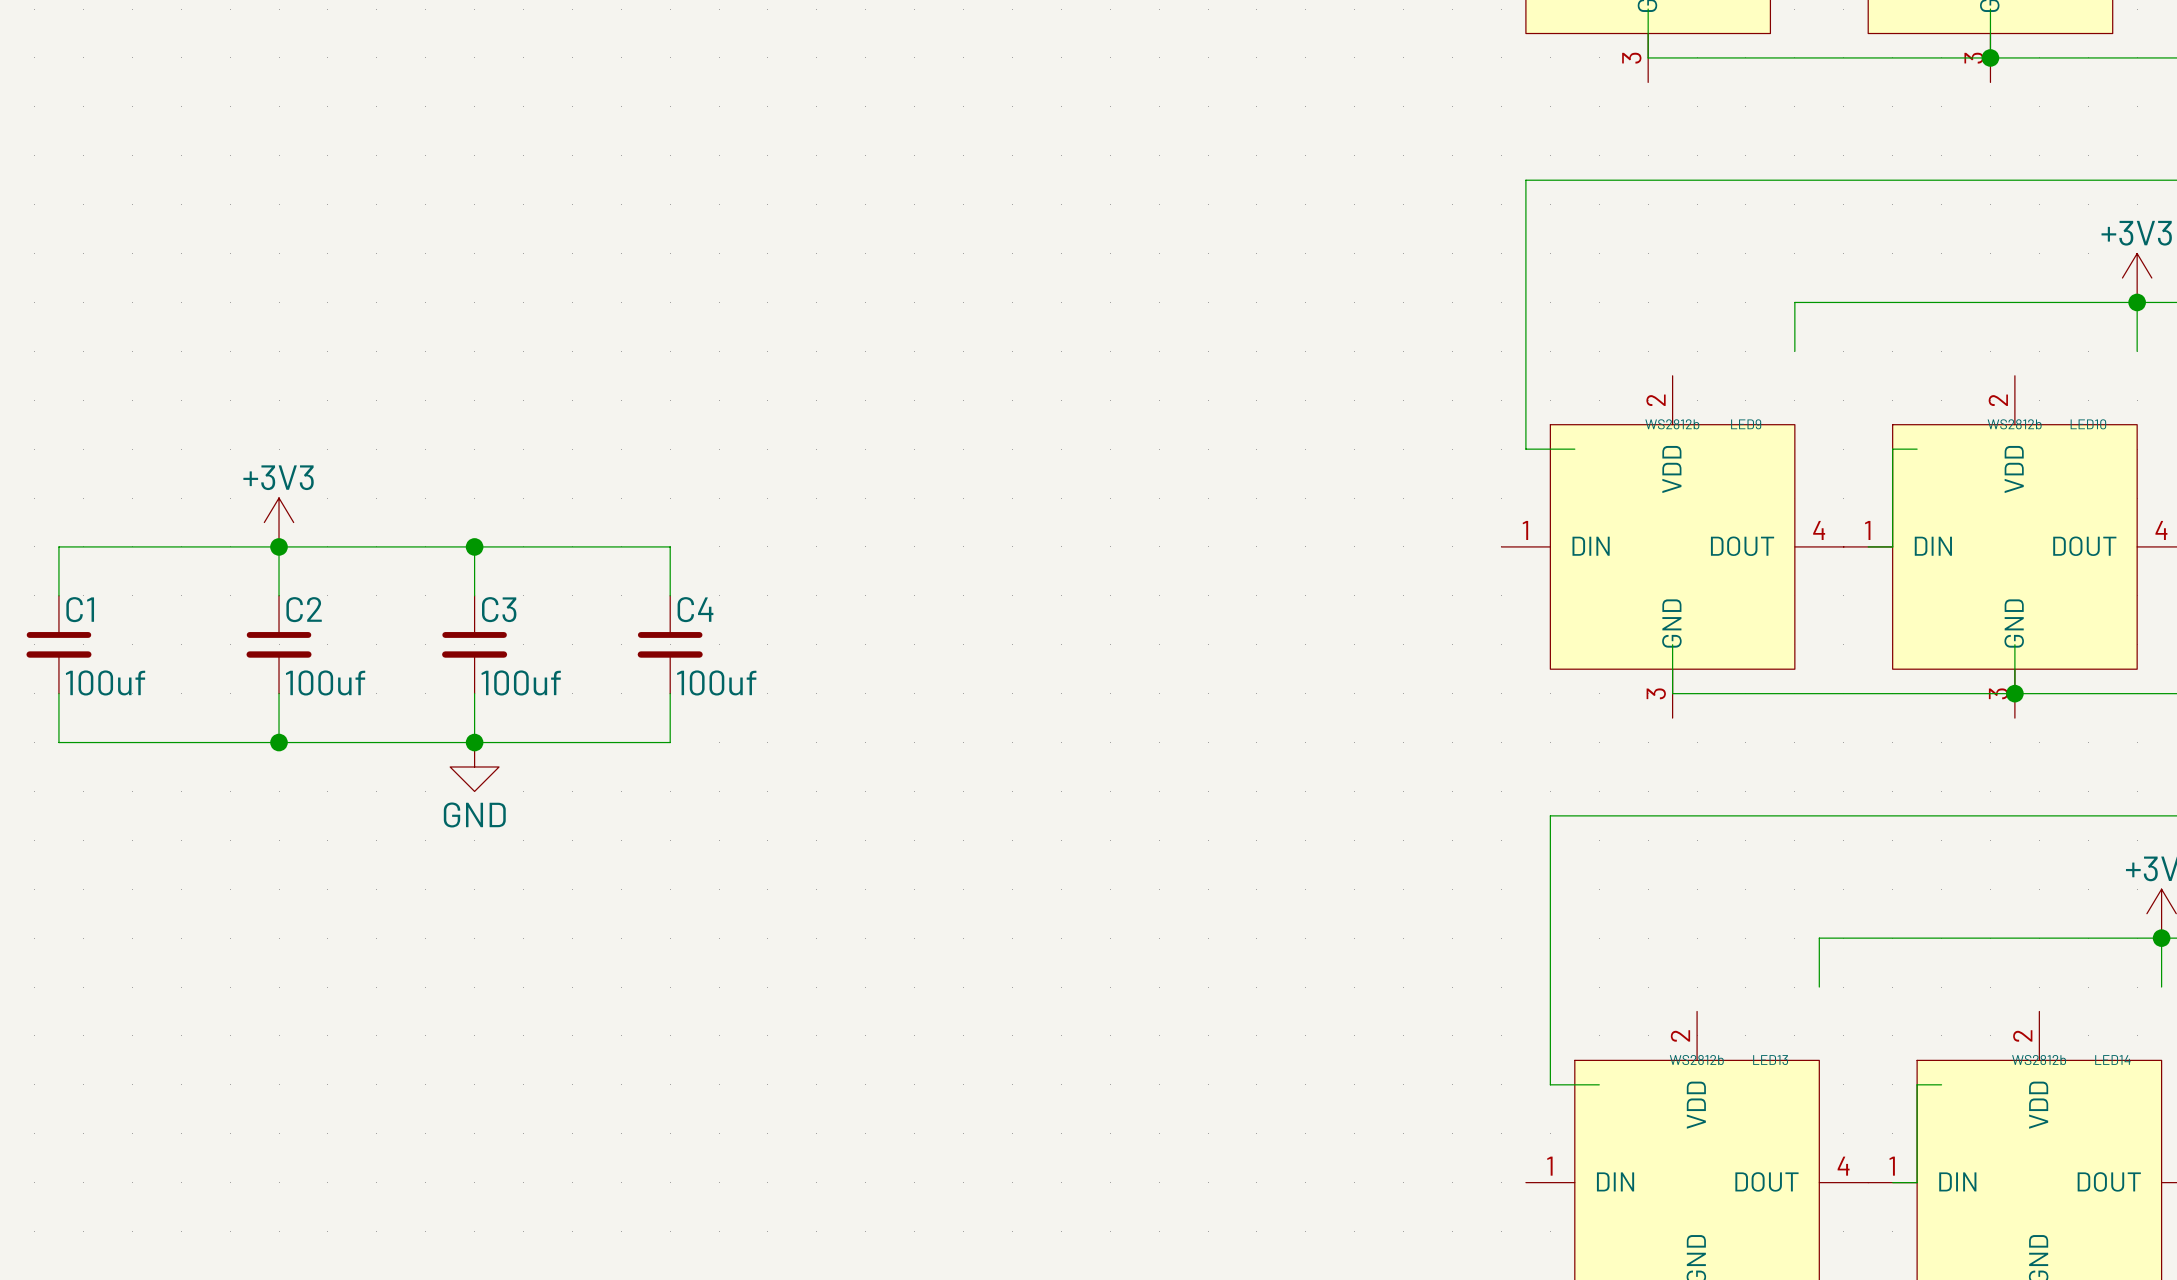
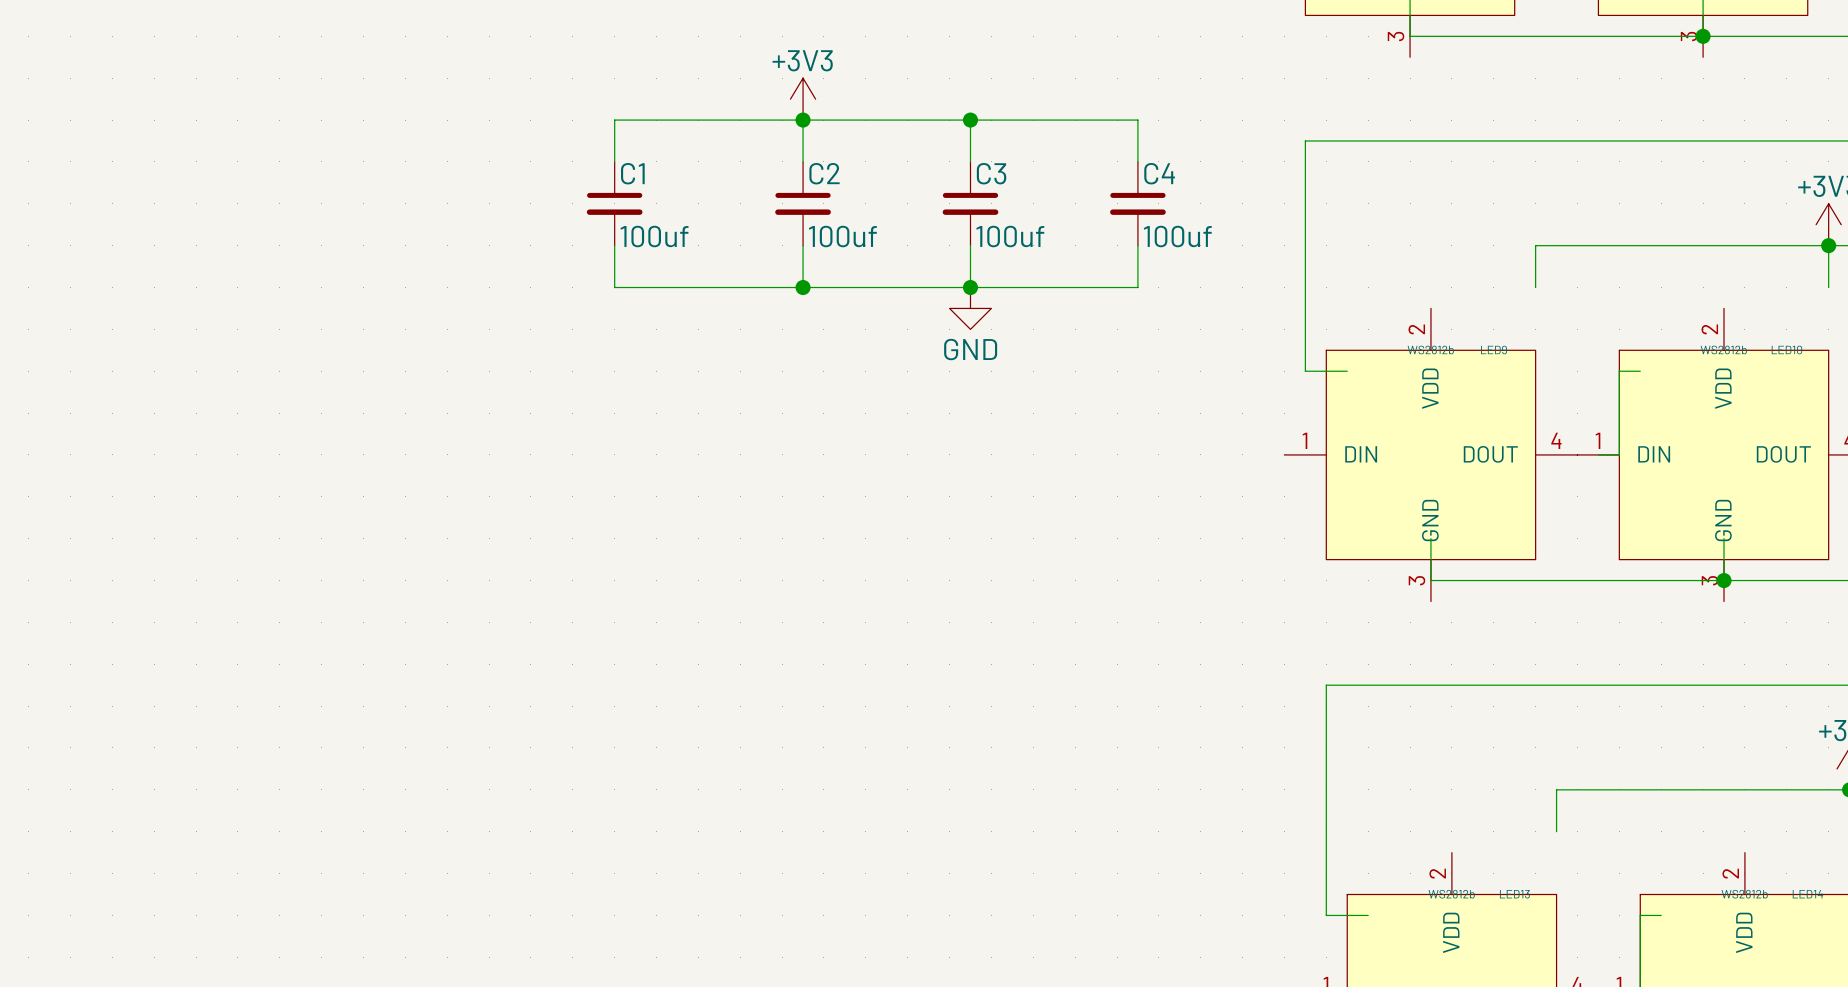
power symbol: none -> +3V3 (803, 99)
wire: none -> (803, 120) (803, 161)
junction: none -> (803, 120)
wire: none -> (970, 120) (970, 161)
junction: none -> (970, 120)
wire: none -> (614, 161) (614, 120) (1137, 120) (1137, 161)
wire: none -> (614, 245) (614, 287) (1137, 287) (1137, 245)
wire: none -> (803, 245) (803, 287)
wire: none -> (970, 245) (970, 287)
junction: none -> (803, 287)
junction: none -> (970, 287)
power symbol: none -> GND (970, 308)
power symbol: +3V3 (279, 522) -> none
wire: (279, 546) (279, 595) -> none
junction: (279, 546) -> none
wire: (474, 546) (474, 595) -> none
junction: (474, 546) -> none
wire: (58, 595) (58, 546) (670, 546) (670, 595) -> none
C1 position: (58, 644) -> (614, 203)
C2 position: (279, 644) -> (803, 203)
C3 position: (474, 644) -> (970, 203)
C4 position: (670, 644) -> (1137, 203)
wire: (58, 693) (58, 742) (670, 742) (670, 693) -> none
wire: (279, 693) (279, 742) -> none
wire: (474, 693) (474, 742) -> none
junction: (279, 742) -> none
junction: (474, 742) -> none
power symbol: GND (474, 766) -> none

